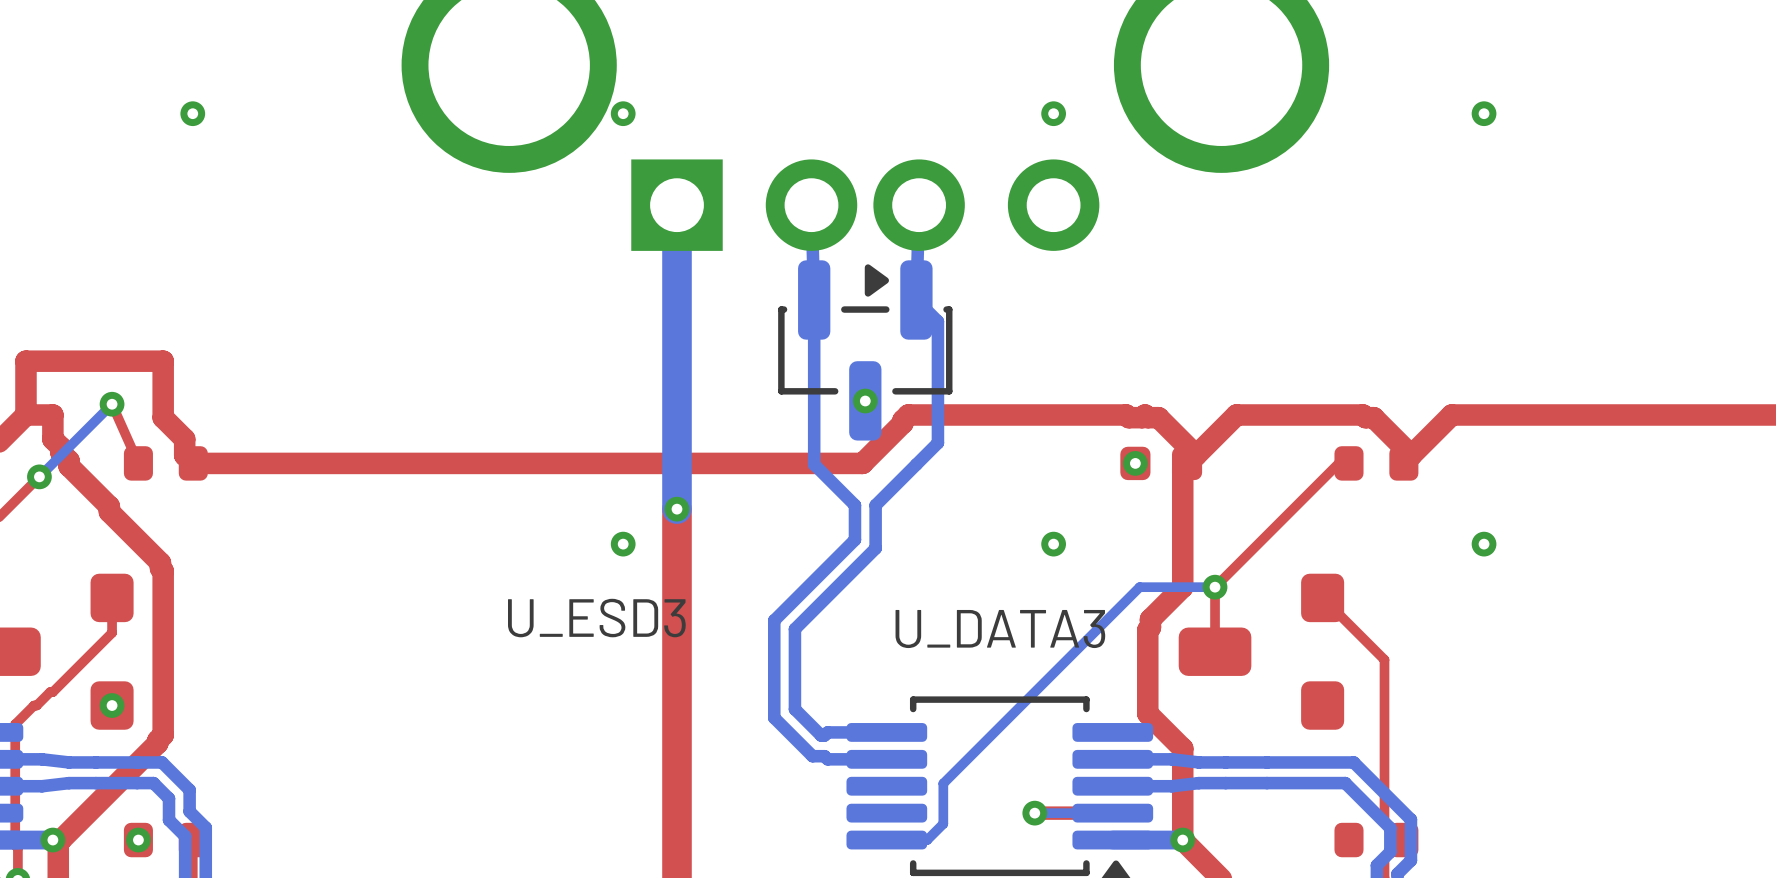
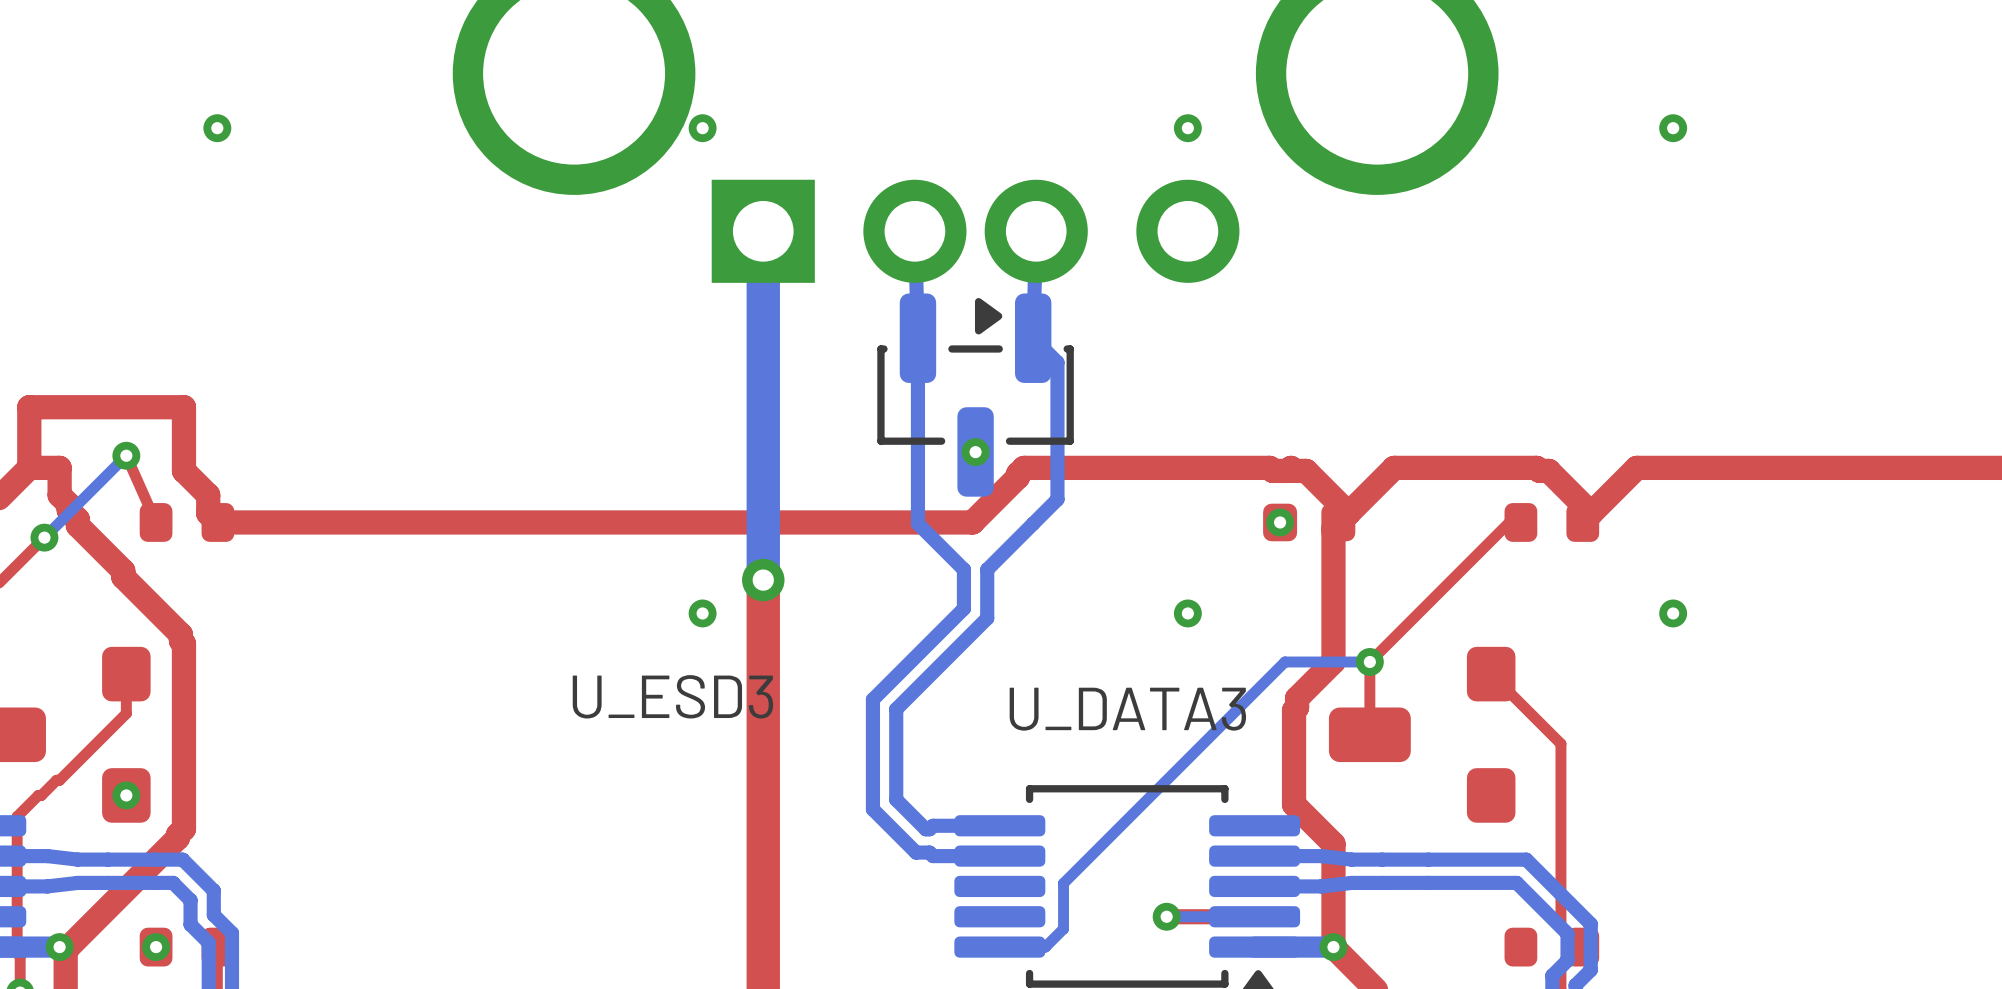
via size: [664, 496, 690, 522] -> [742, 558, 785, 602]

